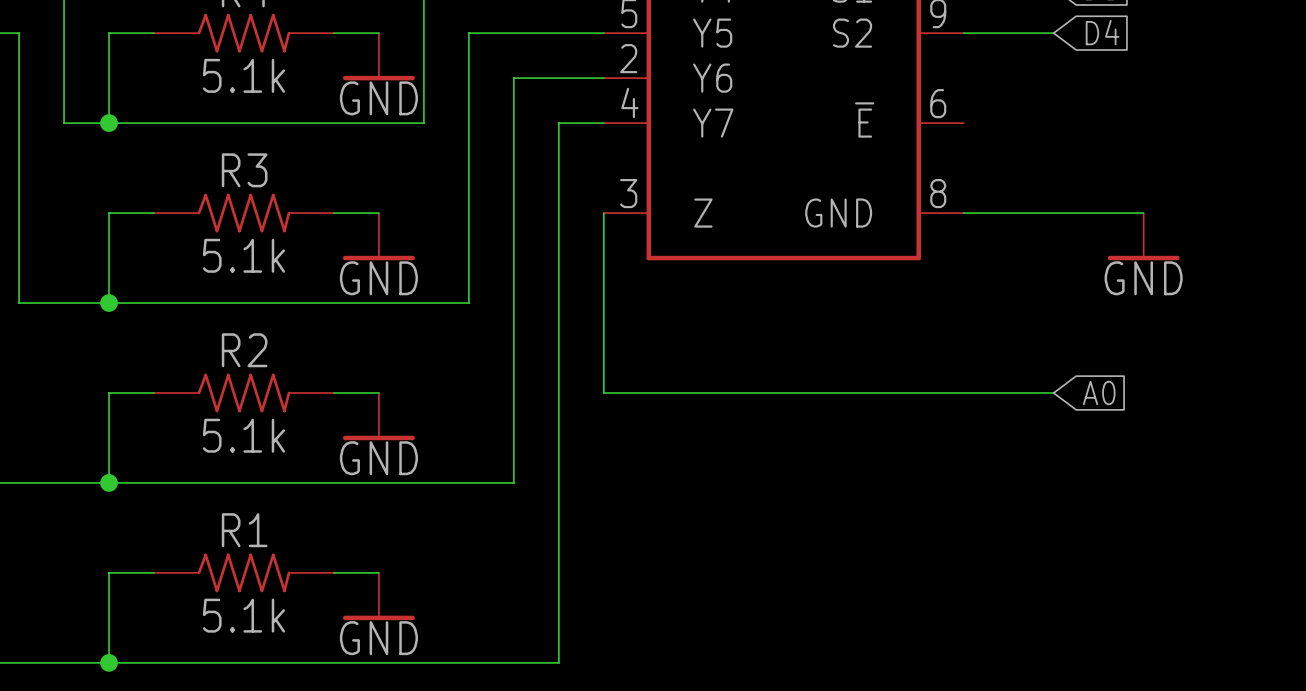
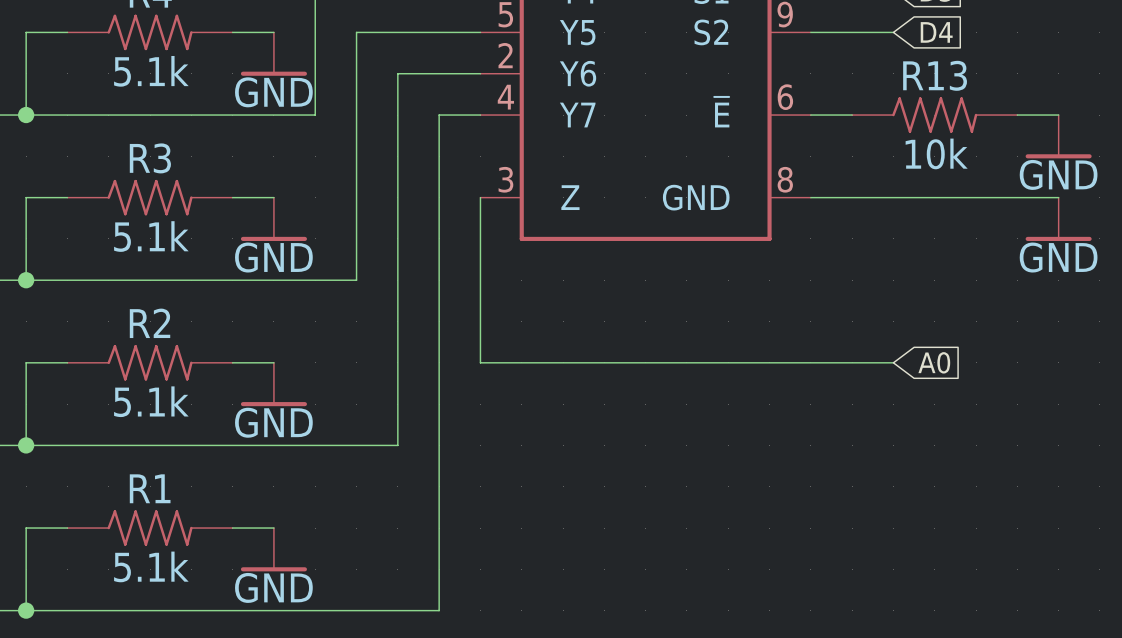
wire: none -> (810, 115) (852, 115)
R13: none -> 10k (934, 115)
wire: none -> (1017, 115) (1058, 115)
power symbol: none -> GND (1058, 136)
wire: none -> (976, 197) (1058, 197)
power symbol: GND (1143, 236) -> none
power symbol: none -> GND (1058, 219)

